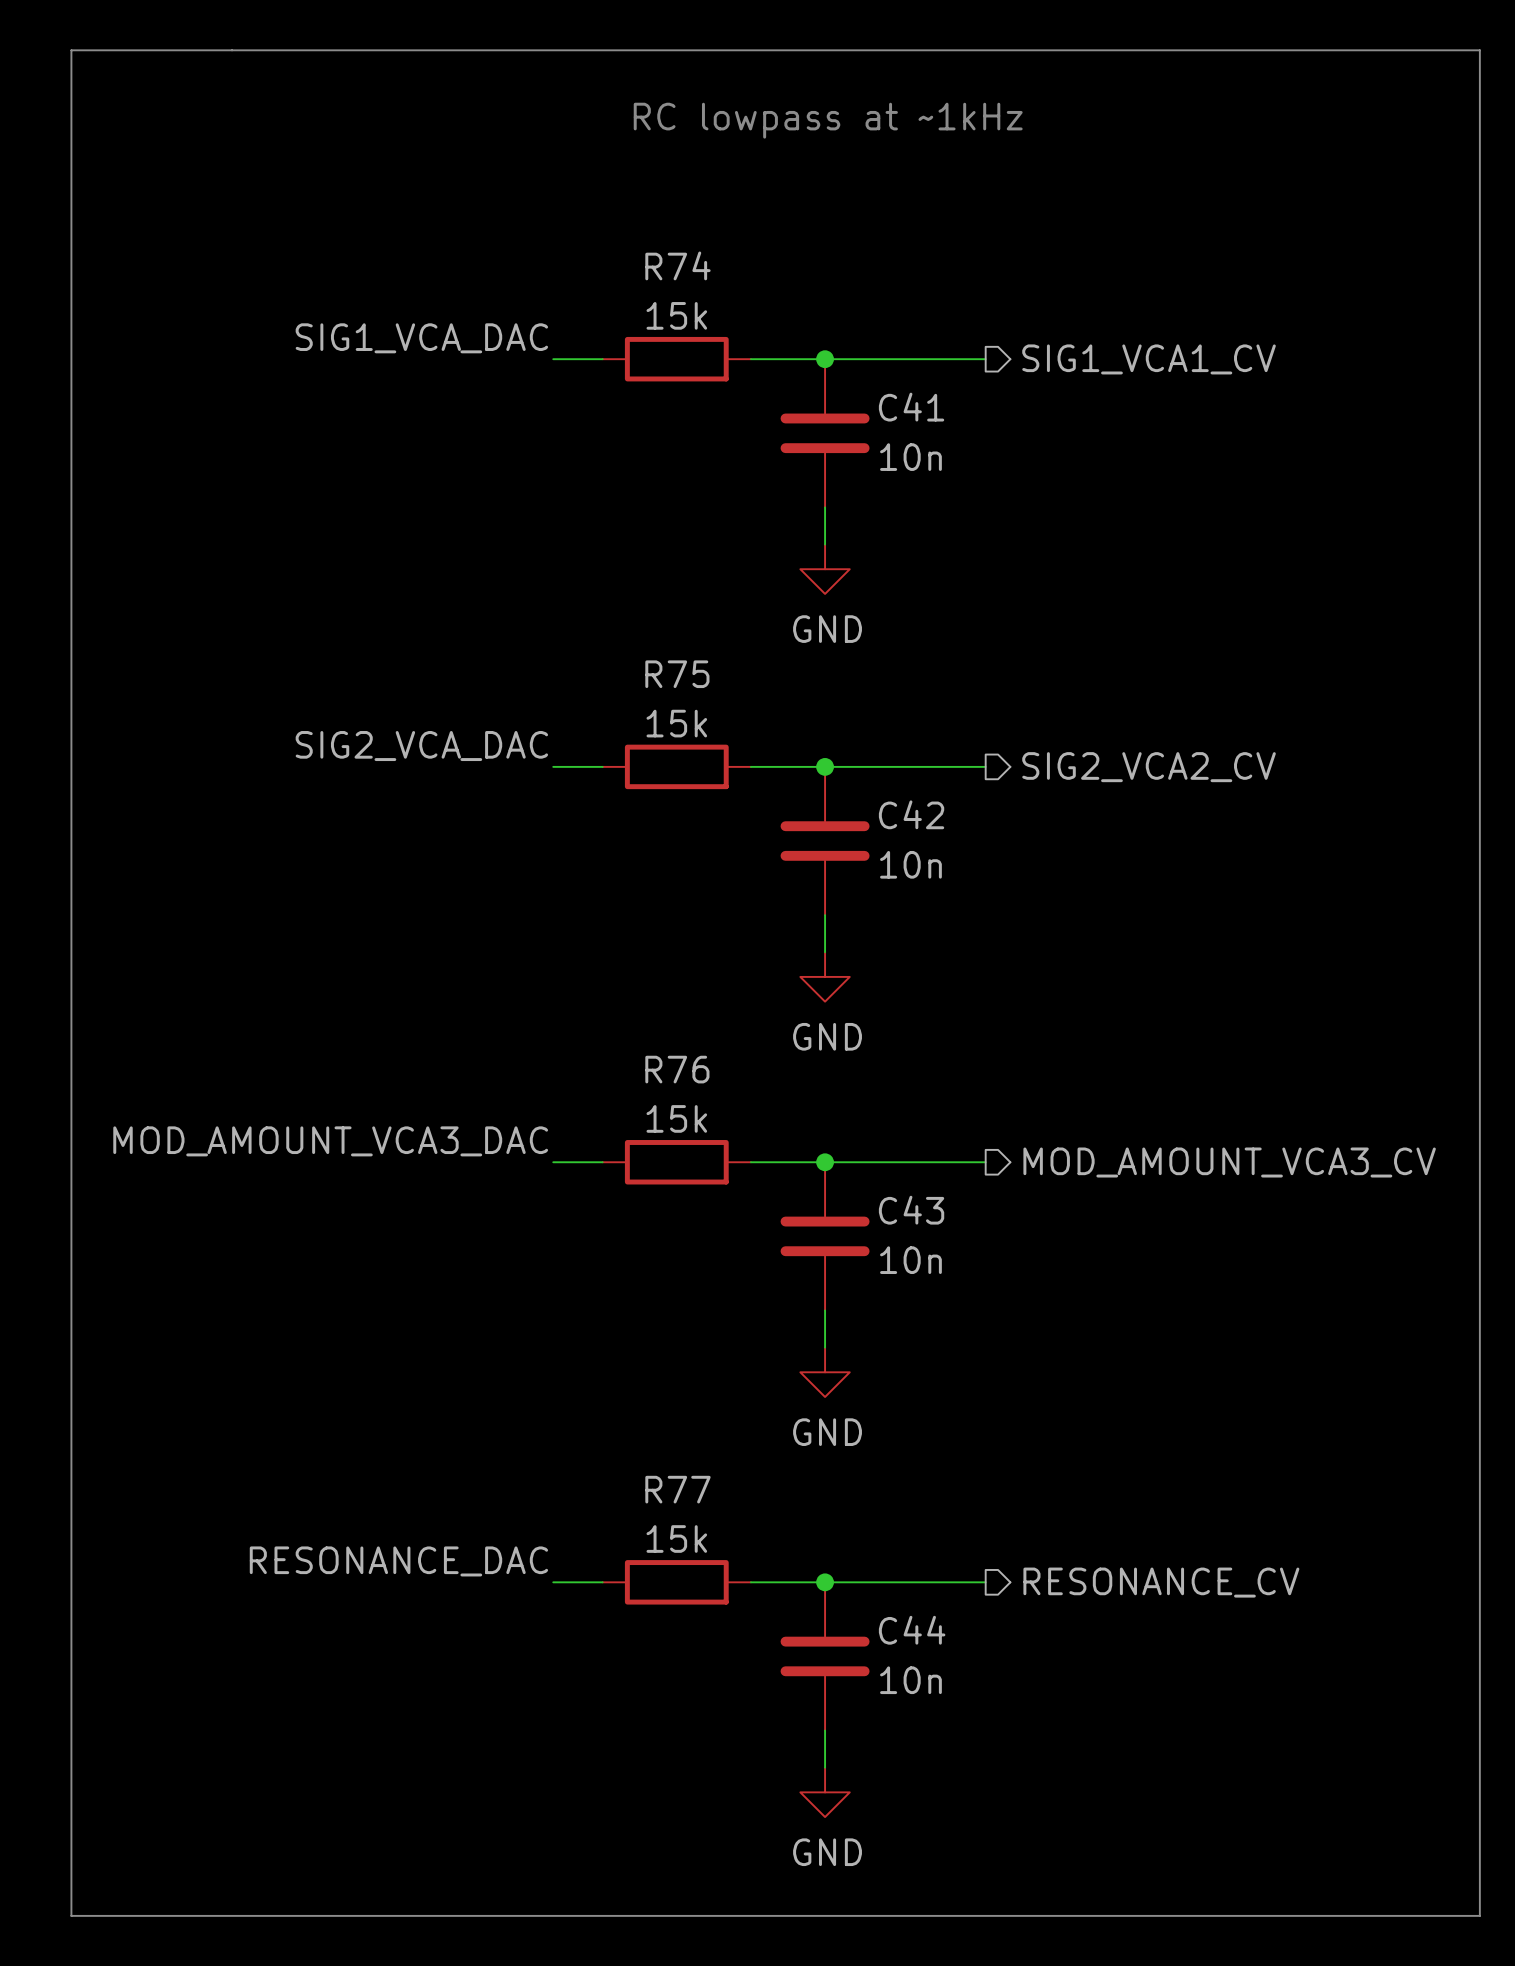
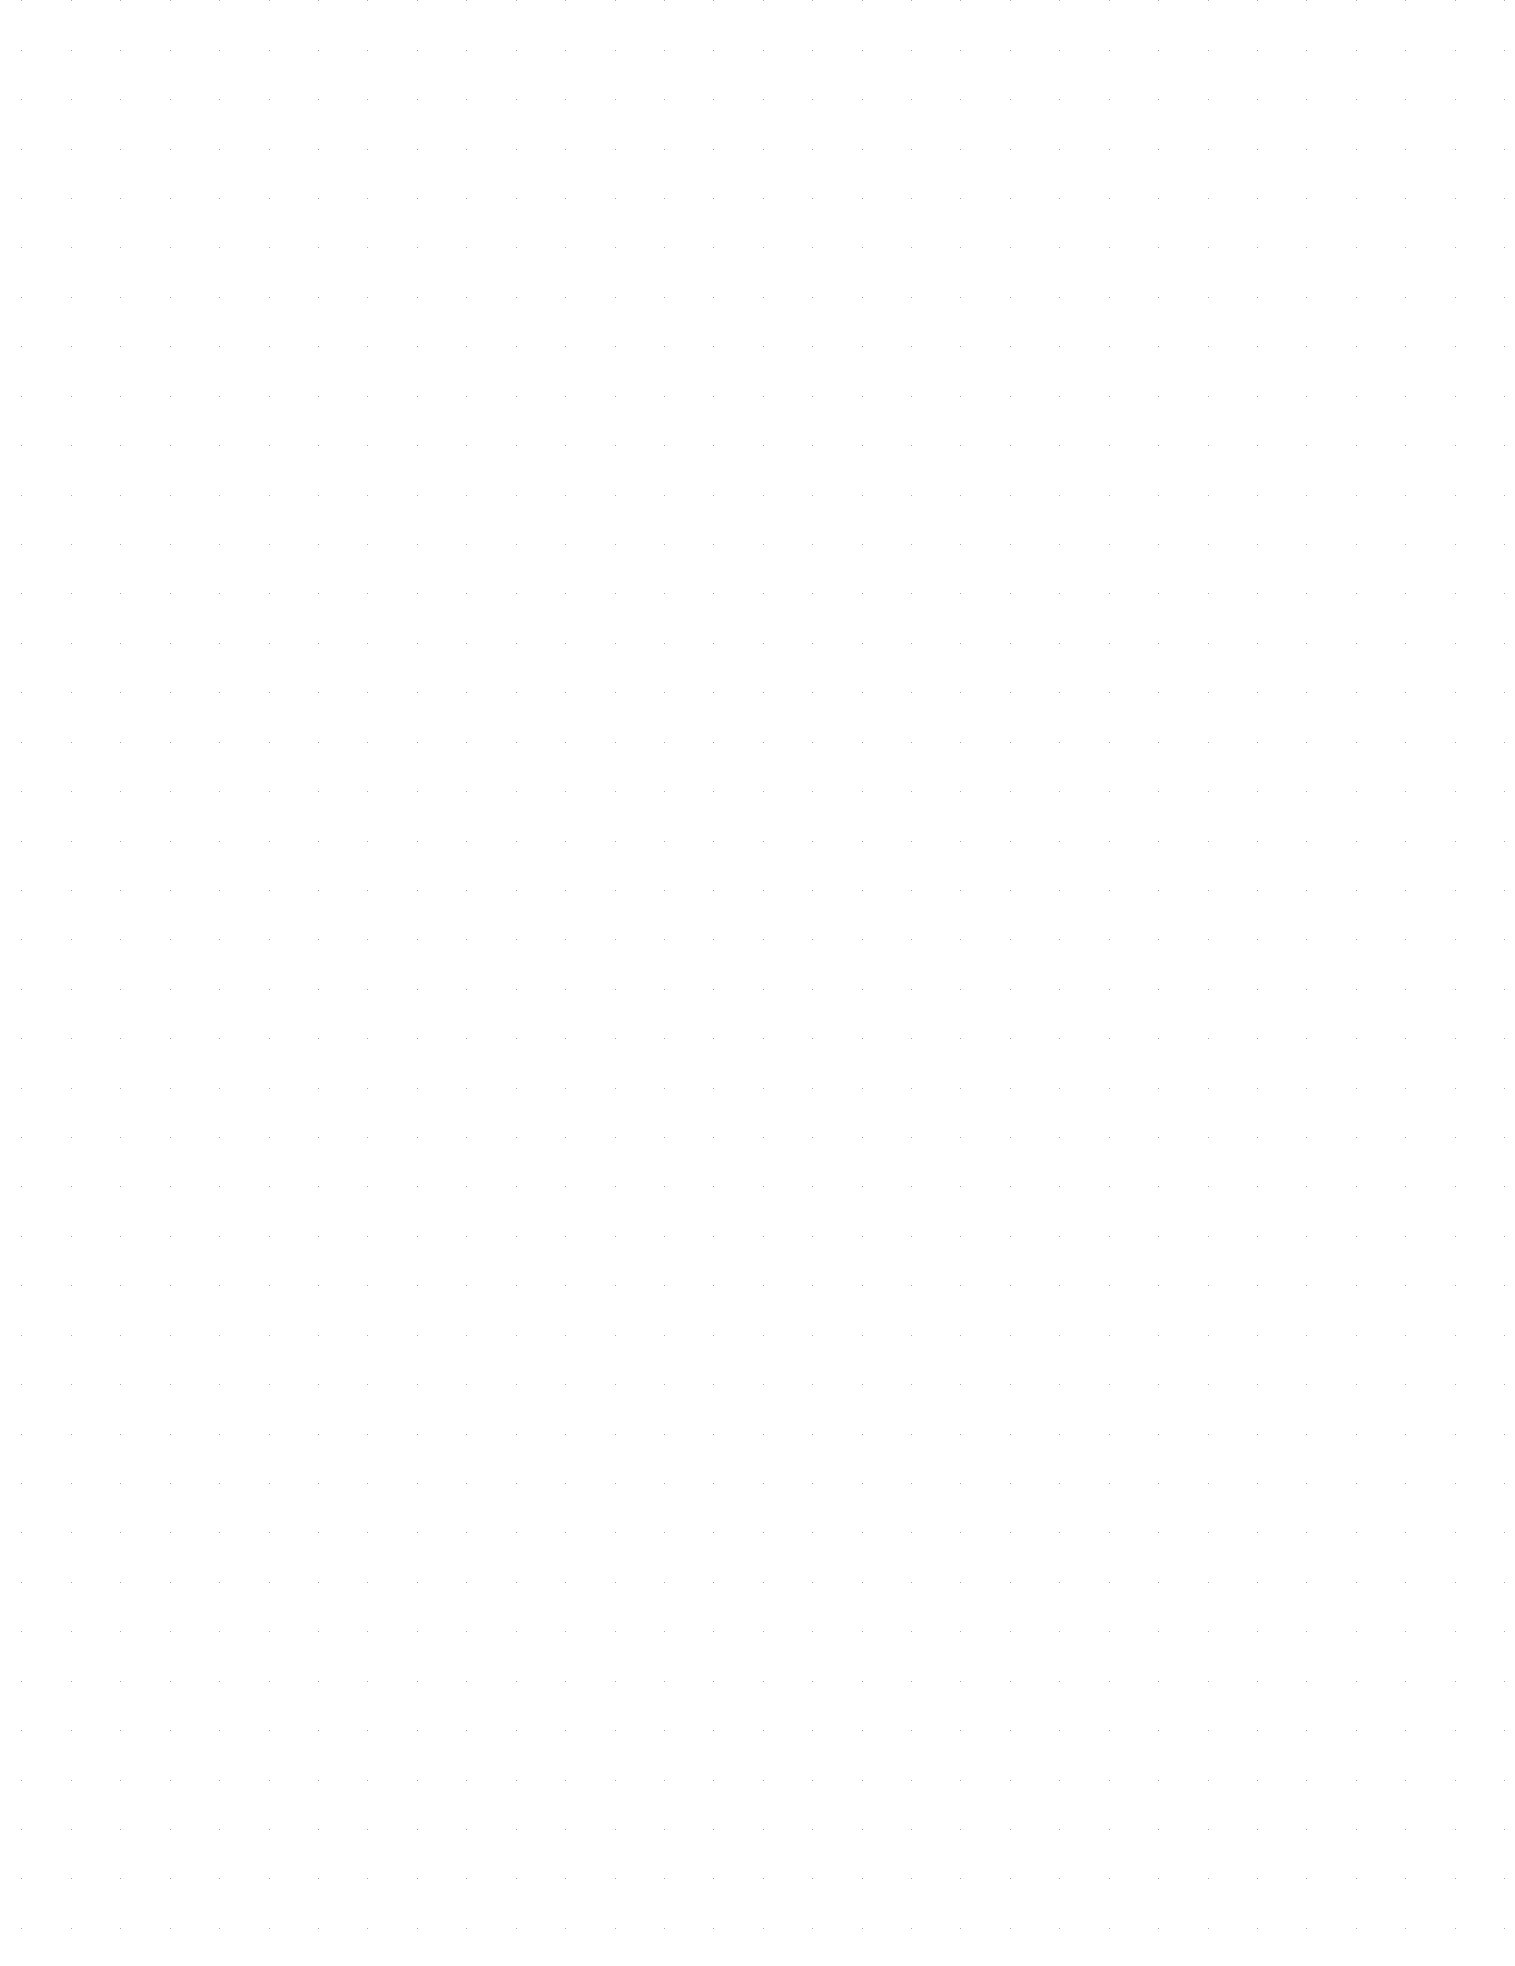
line: (71, 50) (71, 1915) (1479, 1915) (1479, 50) (71, 50) -> none
text: RC lowpass at ~1kHz (828, 120) -> none
label: SIG1_VCA_DAC (421, 338) -> none
wire: (553, 359) (602, 359) -> none
R74: 15k (676, 359) -> none
wire: (750, 359) (985, 359) -> none
junction: (825, 359) -> none
hierarchical label: SIG1_VCA1_CV (1149, 359) -> none
C41: 10n (825, 433) -> none
wire: (825, 507) (825, 544) -> none
power symbol: GND (825, 569) -> none
label: SIG2_VCA_DAC (421, 746) -> none
wire: (553, 766) (602, 766) -> none
R75: 15k (676, 766) -> none
wire: (750, 766) (985, 766) -> none
junction: (825, 766) -> none
hierarchical label: SIG2_VCA2_CV (1149, 767) -> none
C42: 10n (825, 841) -> none
wire: (825, 915) (825, 952) -> none
power symbol: GND (825, 976) -> none
label: MOD_AMOUNT_VCA3_DAC (330, 1141) -> none
wire: (553, 1162) (602, 1162) -> none
R76: 15k (676, 1162) -> none
wire: (750, 1162) (985, 1162) -> none
junction: (825, 1162) -> none
hierarchical label: MOD_AMOUNT_VCA3_CV (1229, 1162) -> none
C43: 10n (825, 1236) -> none
wire: (825, 1310) (825, 1347) -> none
power symbol: GND (825, 1372) -> none
label: RESONANCE_DAC (398, 1561) -> none
wire: (553, 1582) (602, 1582) -> none
R77: 15k (676, 1582) -> none
wire: (750, 1582) (985, 1582) -> none
junction: (825, 1582) -> none
hierarchical label: RESONANCE_CV (1161, 1582) -> none
C44: 10n (825, 1656) -> none
wire: (825, 1730) (825, 1767) -> none
power symbol: GND (825, 1792) -> none

